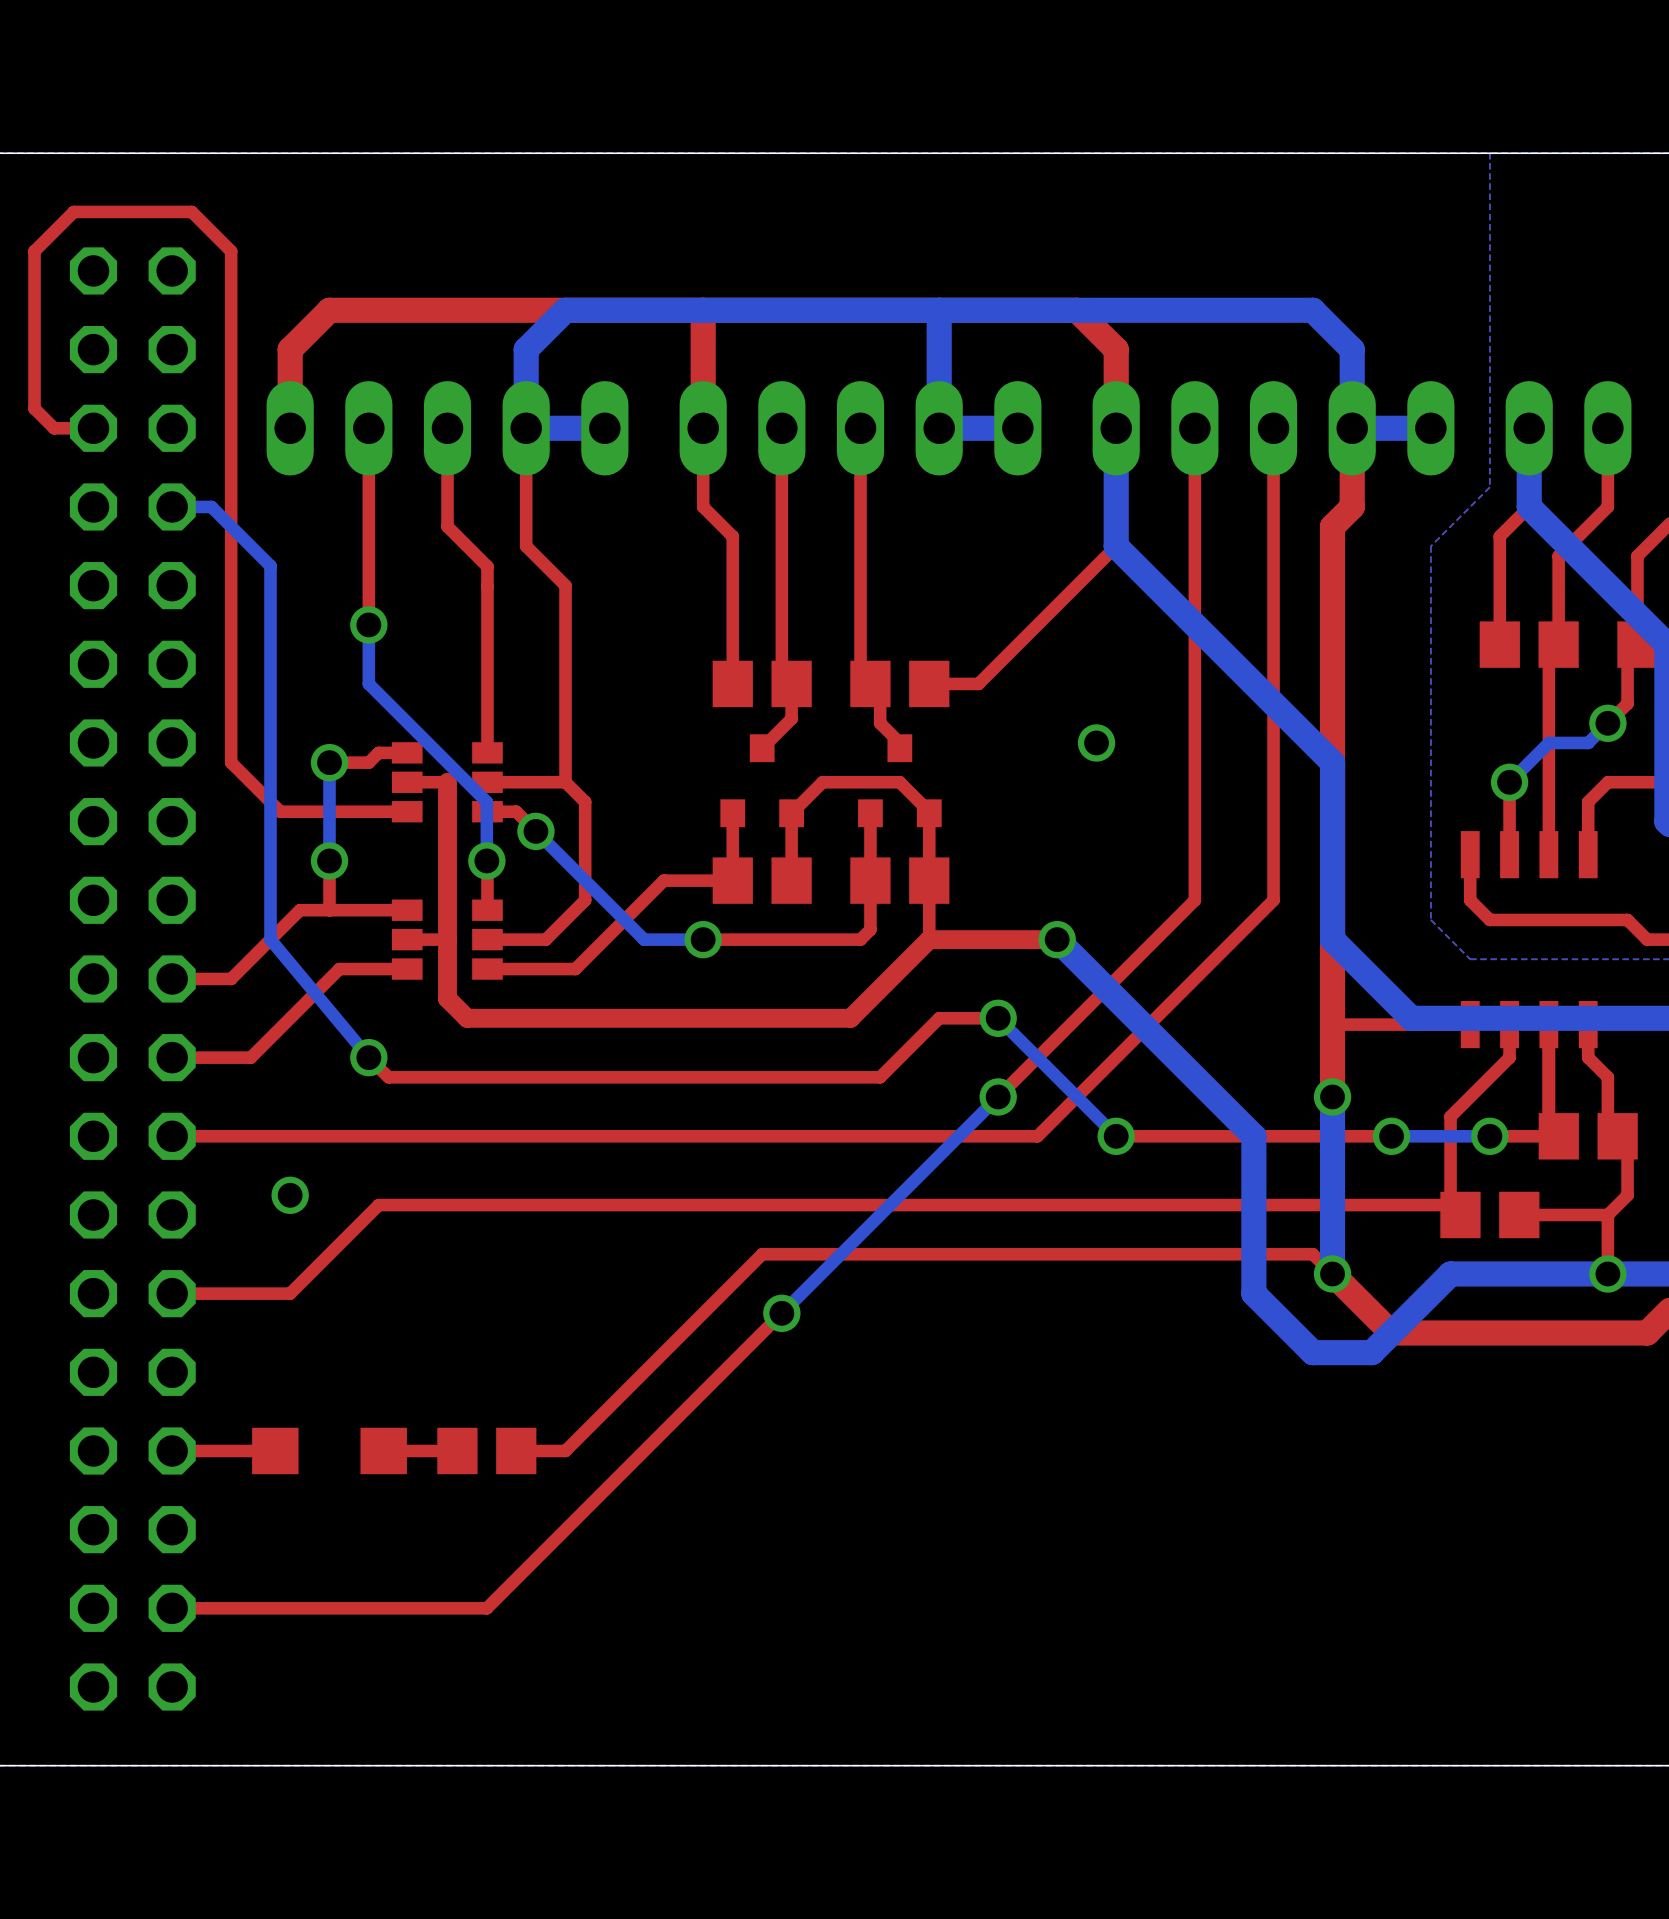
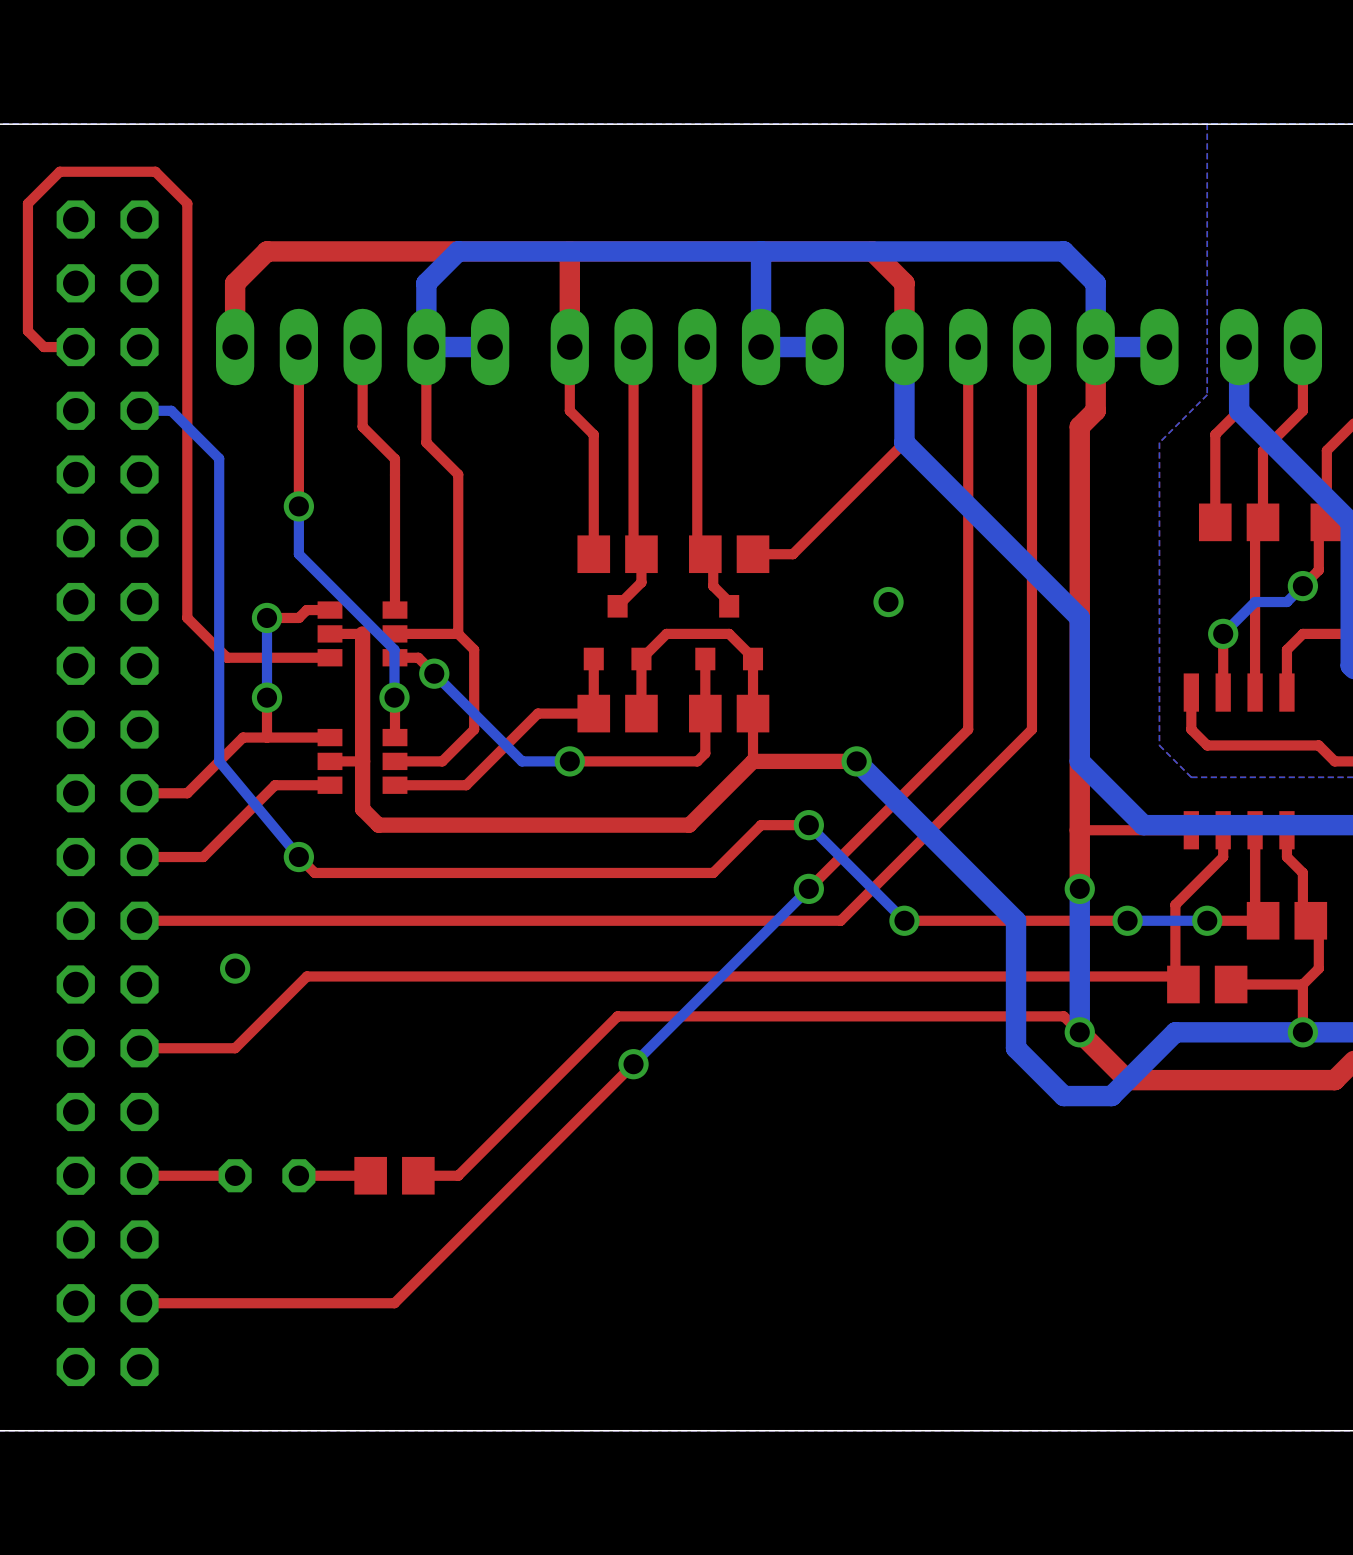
part footprint: [252, 1427, 407, 1475] -> [218, 1159, 316, 1193]

